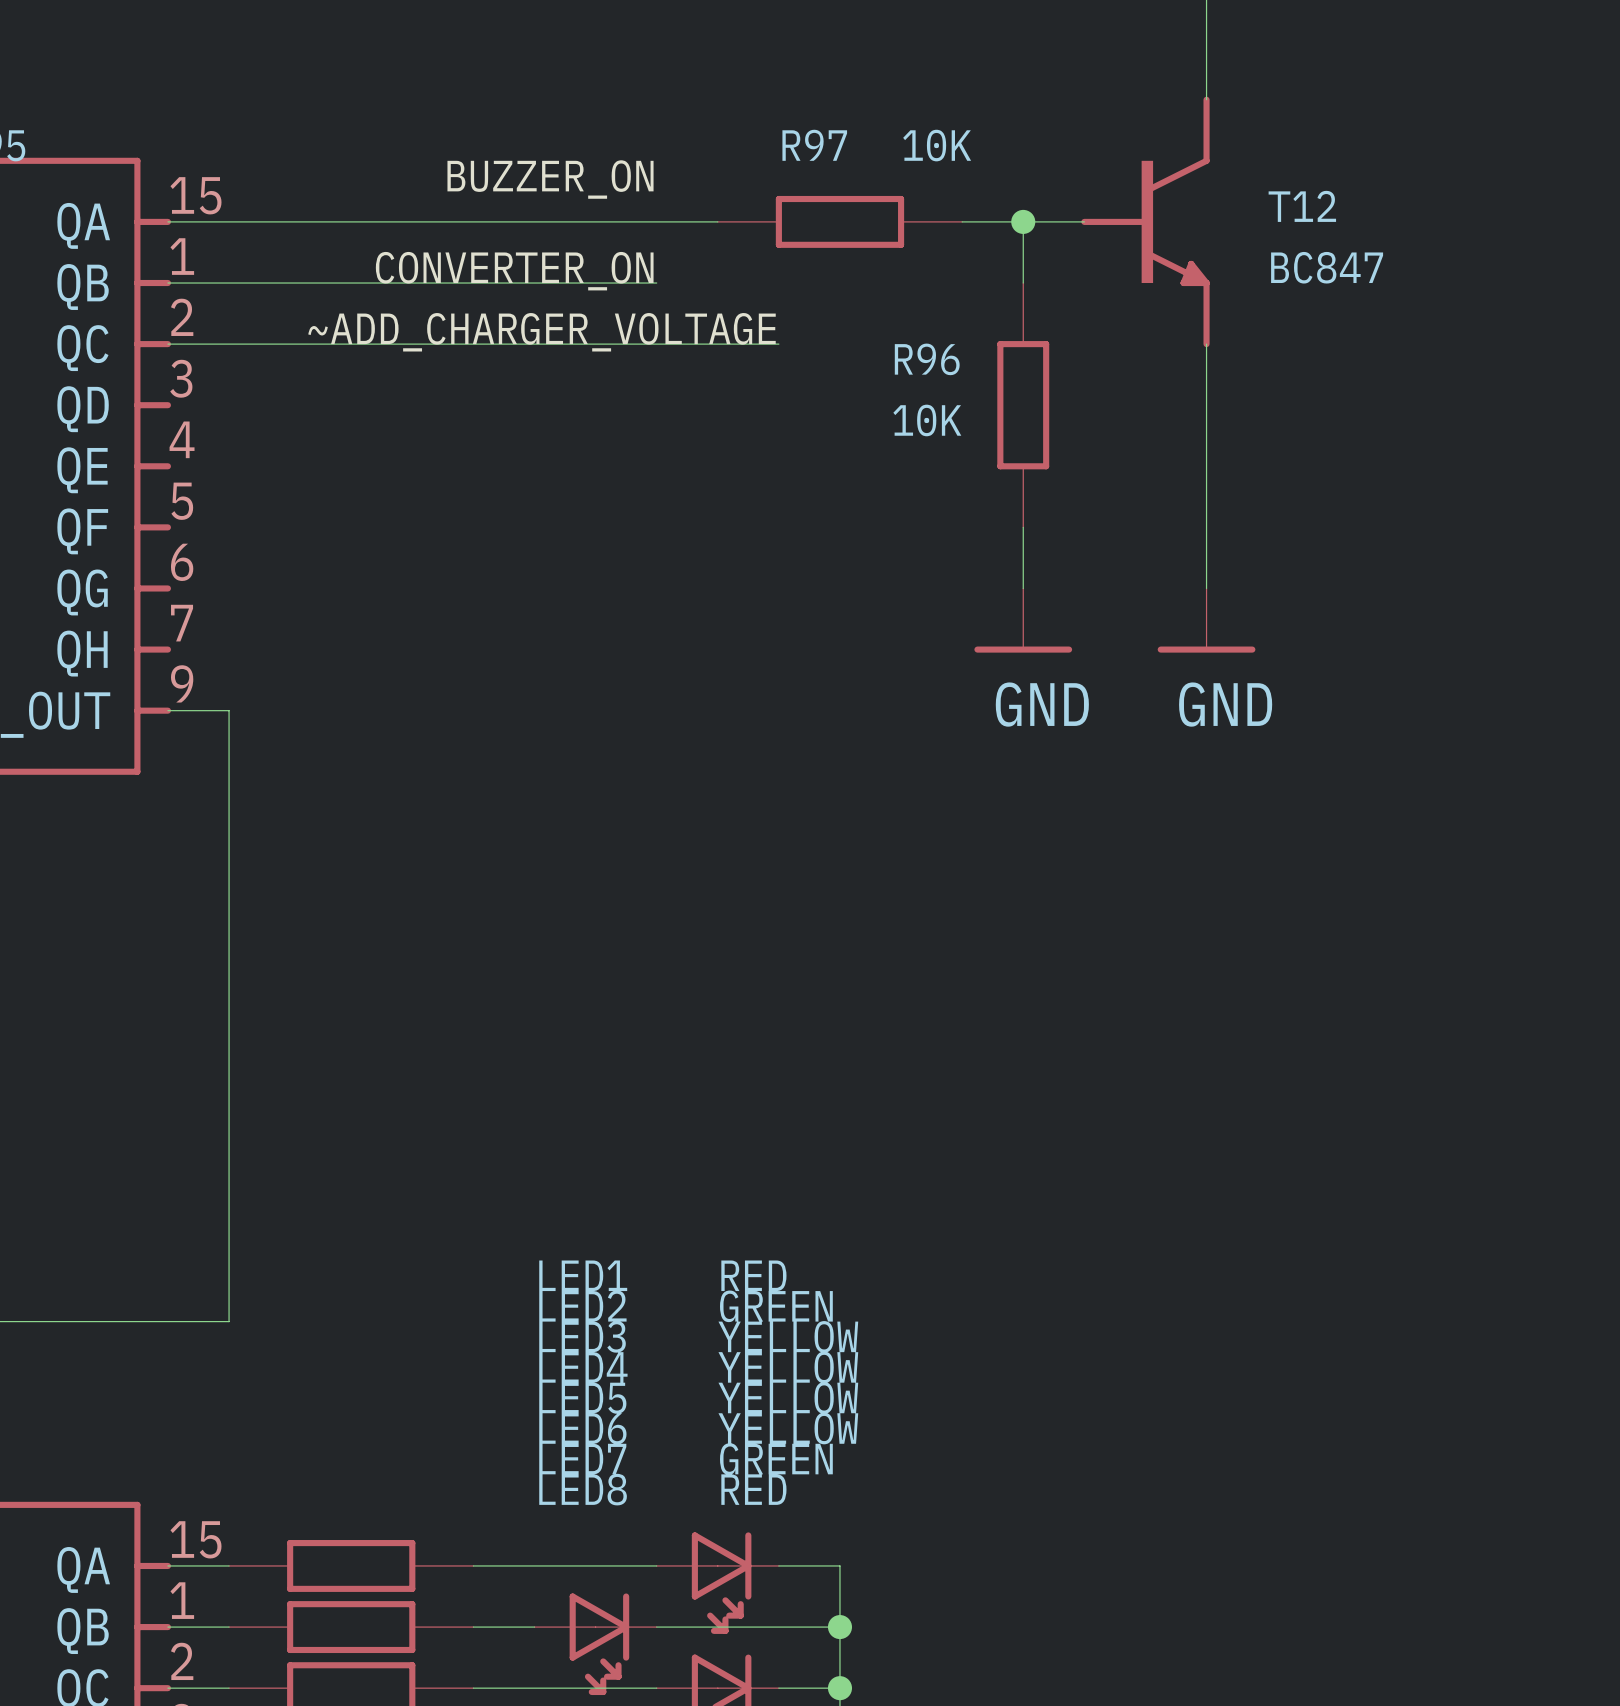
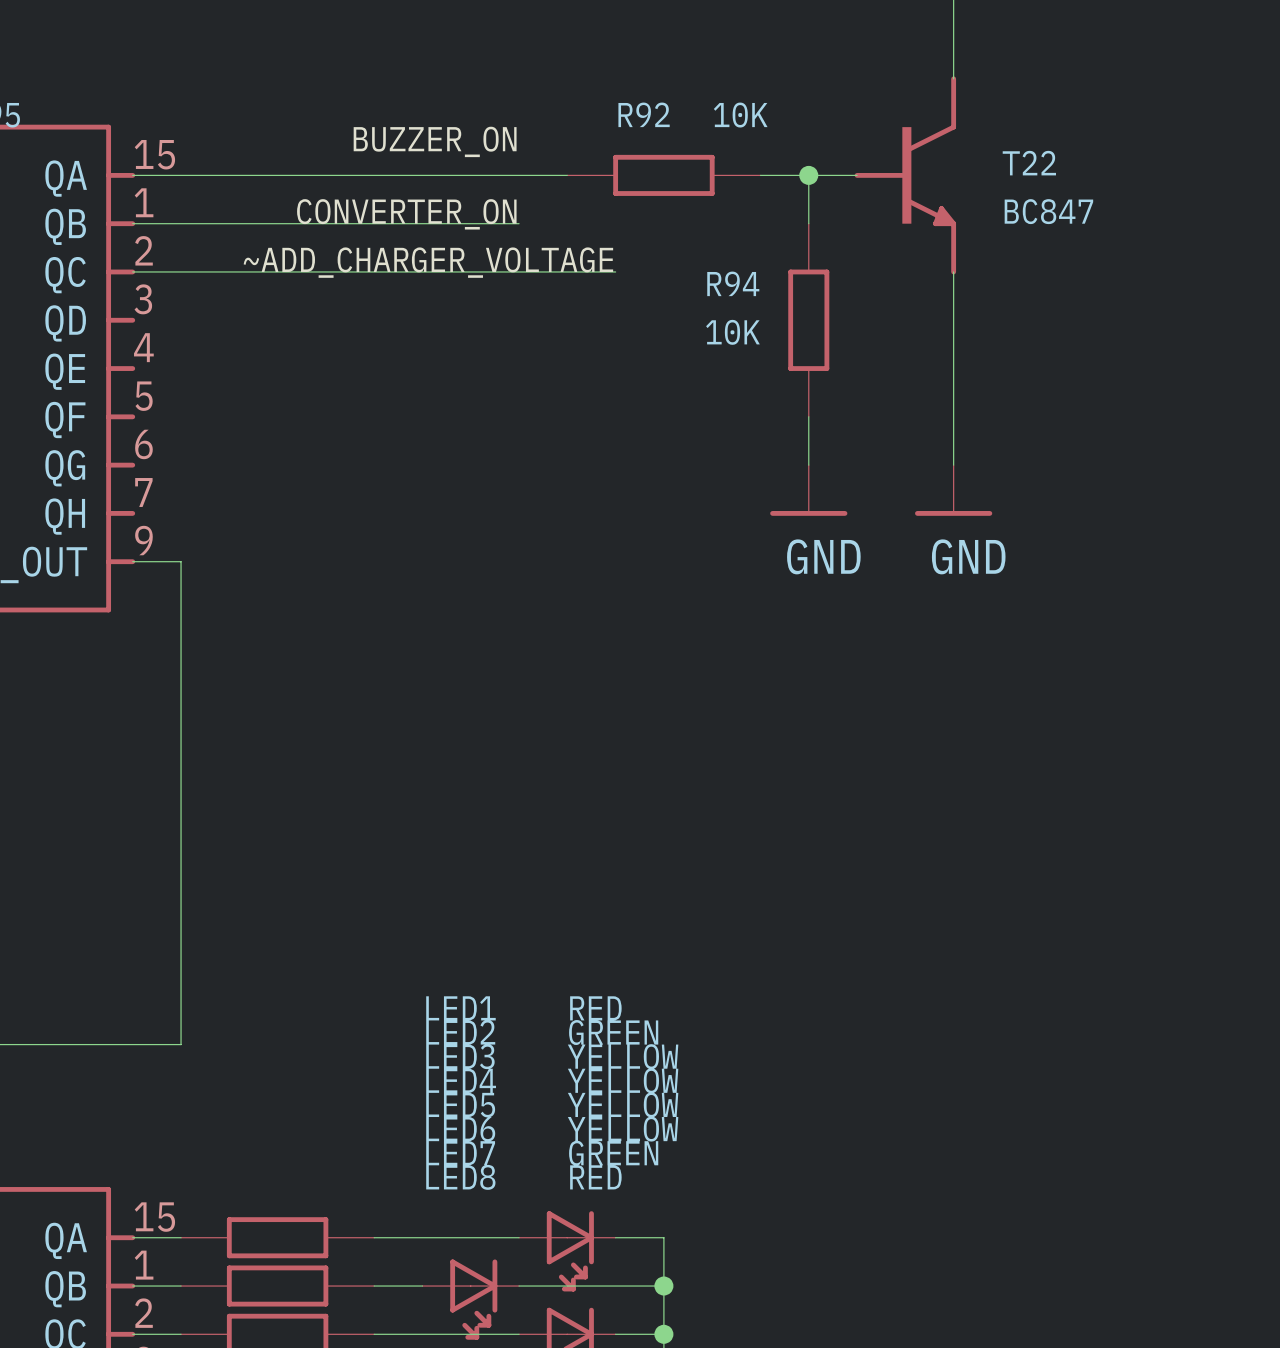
R97 name: R97 (814, 145) -> R92 (644, 114)
T12 name: T12 (1302, 206) -> T22 (1029, 163)
R96 name: R96 (927, 359) -> R94 (733, 283)

